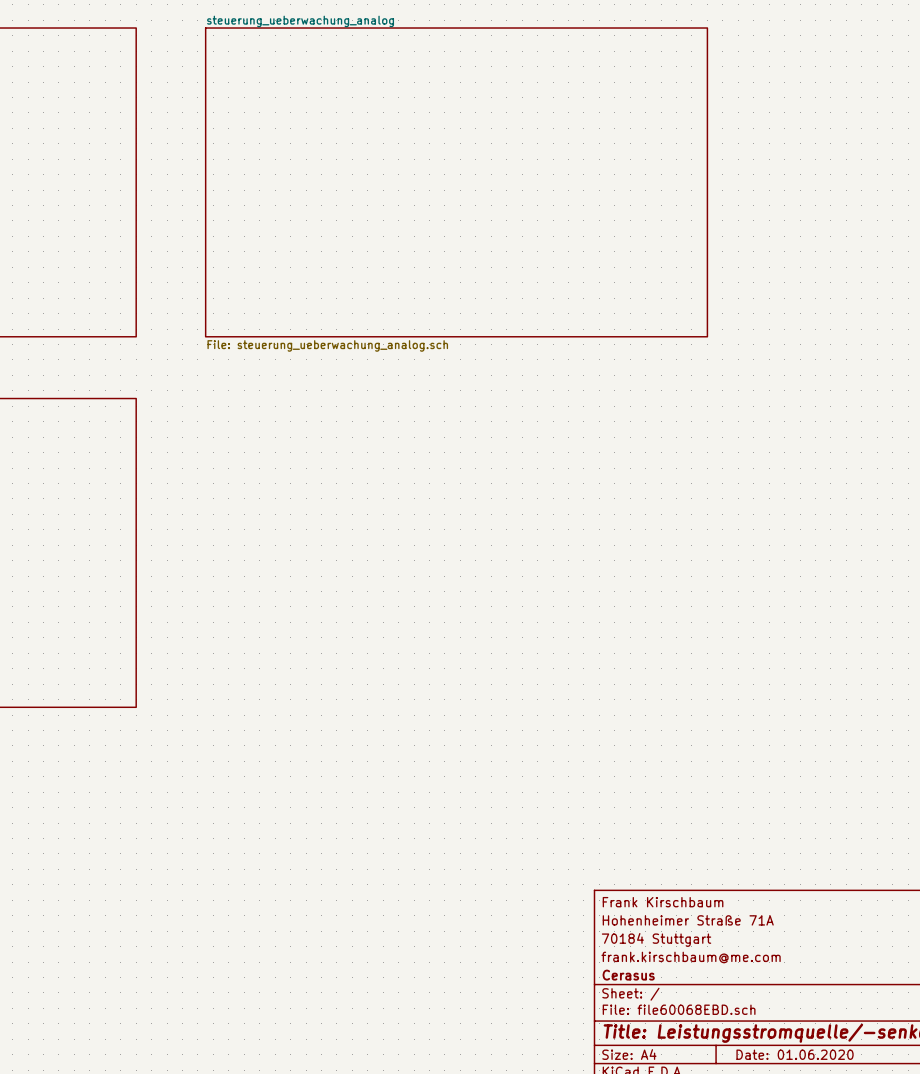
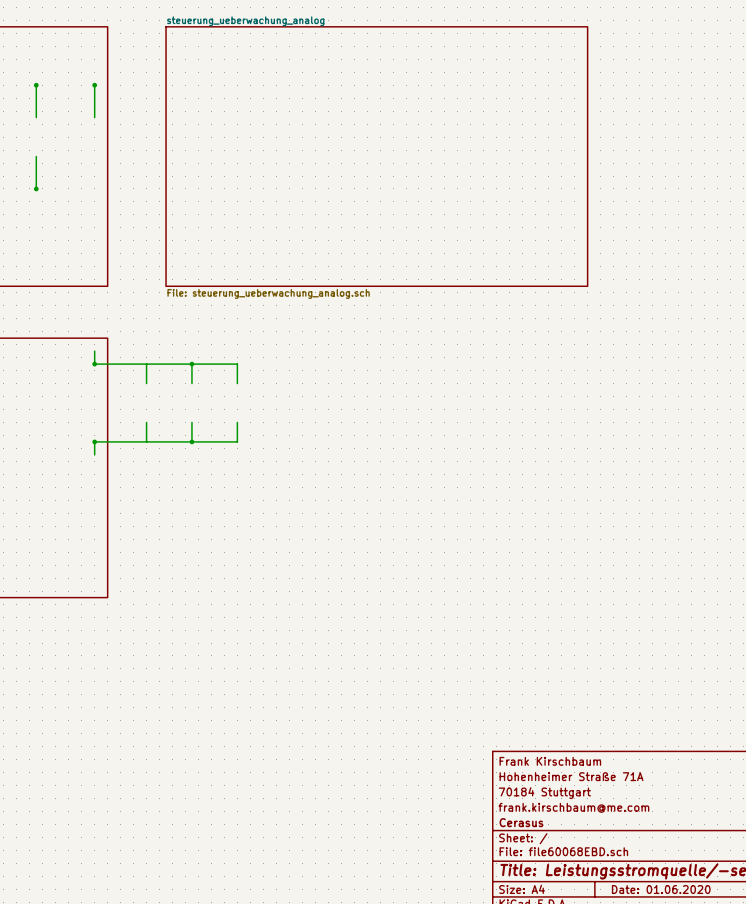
wire: none -> (36, 85) (36, 117)
junction: none -> (36, 85)
wire: none -> (94, 85) (94, 117)
junction: none -> (94, 85)
wire: none -> (36, 156) (36, 188)
junction: none -> (36, 188)
wire: none -> (94, 351) (94, 364) (237, 364) (237, 383)
junction: none -> (94, 364)
wire: none -> (146, 364) (146, 383)
wire: none -> (191, 364) (191, 383)
junction: none -> (191, 364)
wire: none -> (146, 422) (146, 441)
wire: none -> (191, 422) (191, 441)
wire: none -> (237, 422) (237, 441) (94, 441) (94, 454)
junction: none -> (94, 441)
junction: none -> (191, 441)

